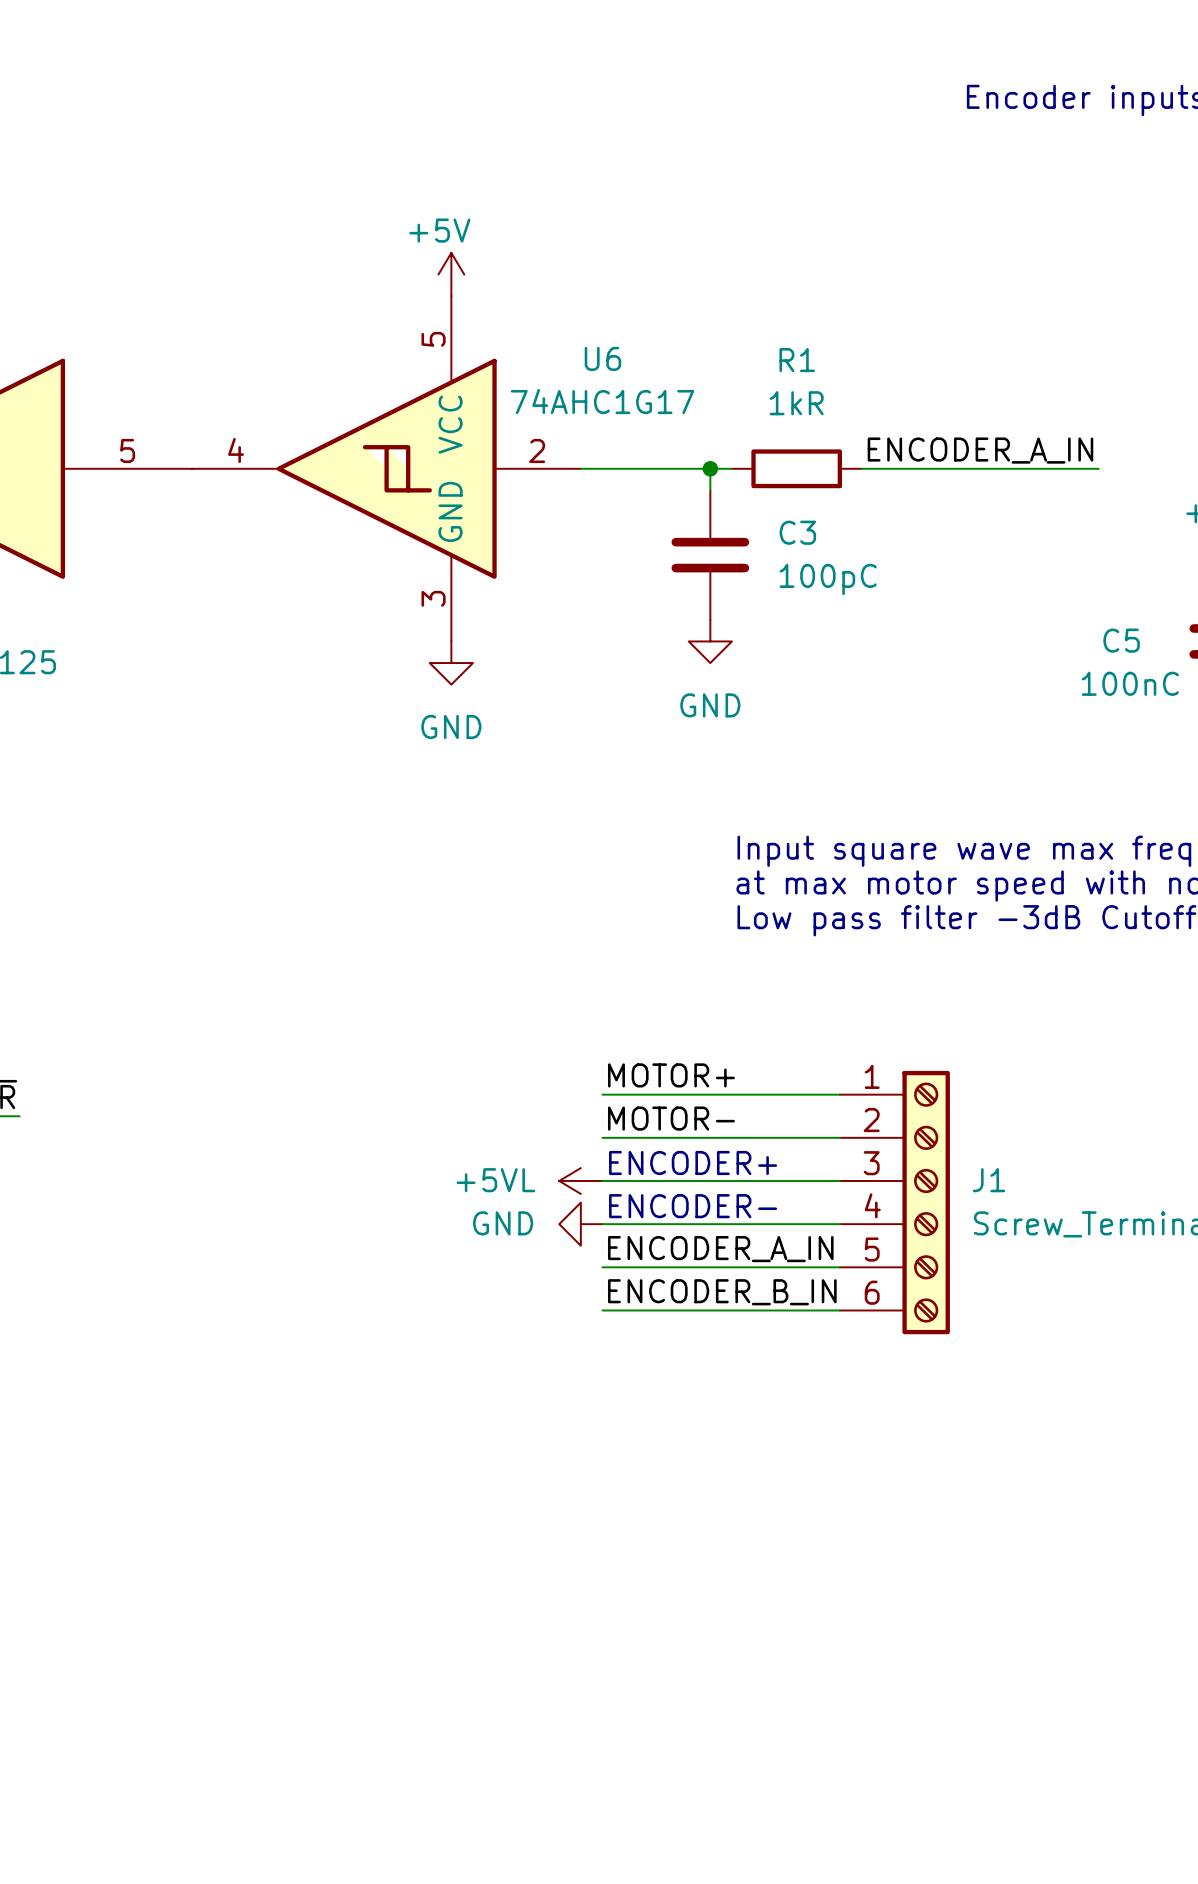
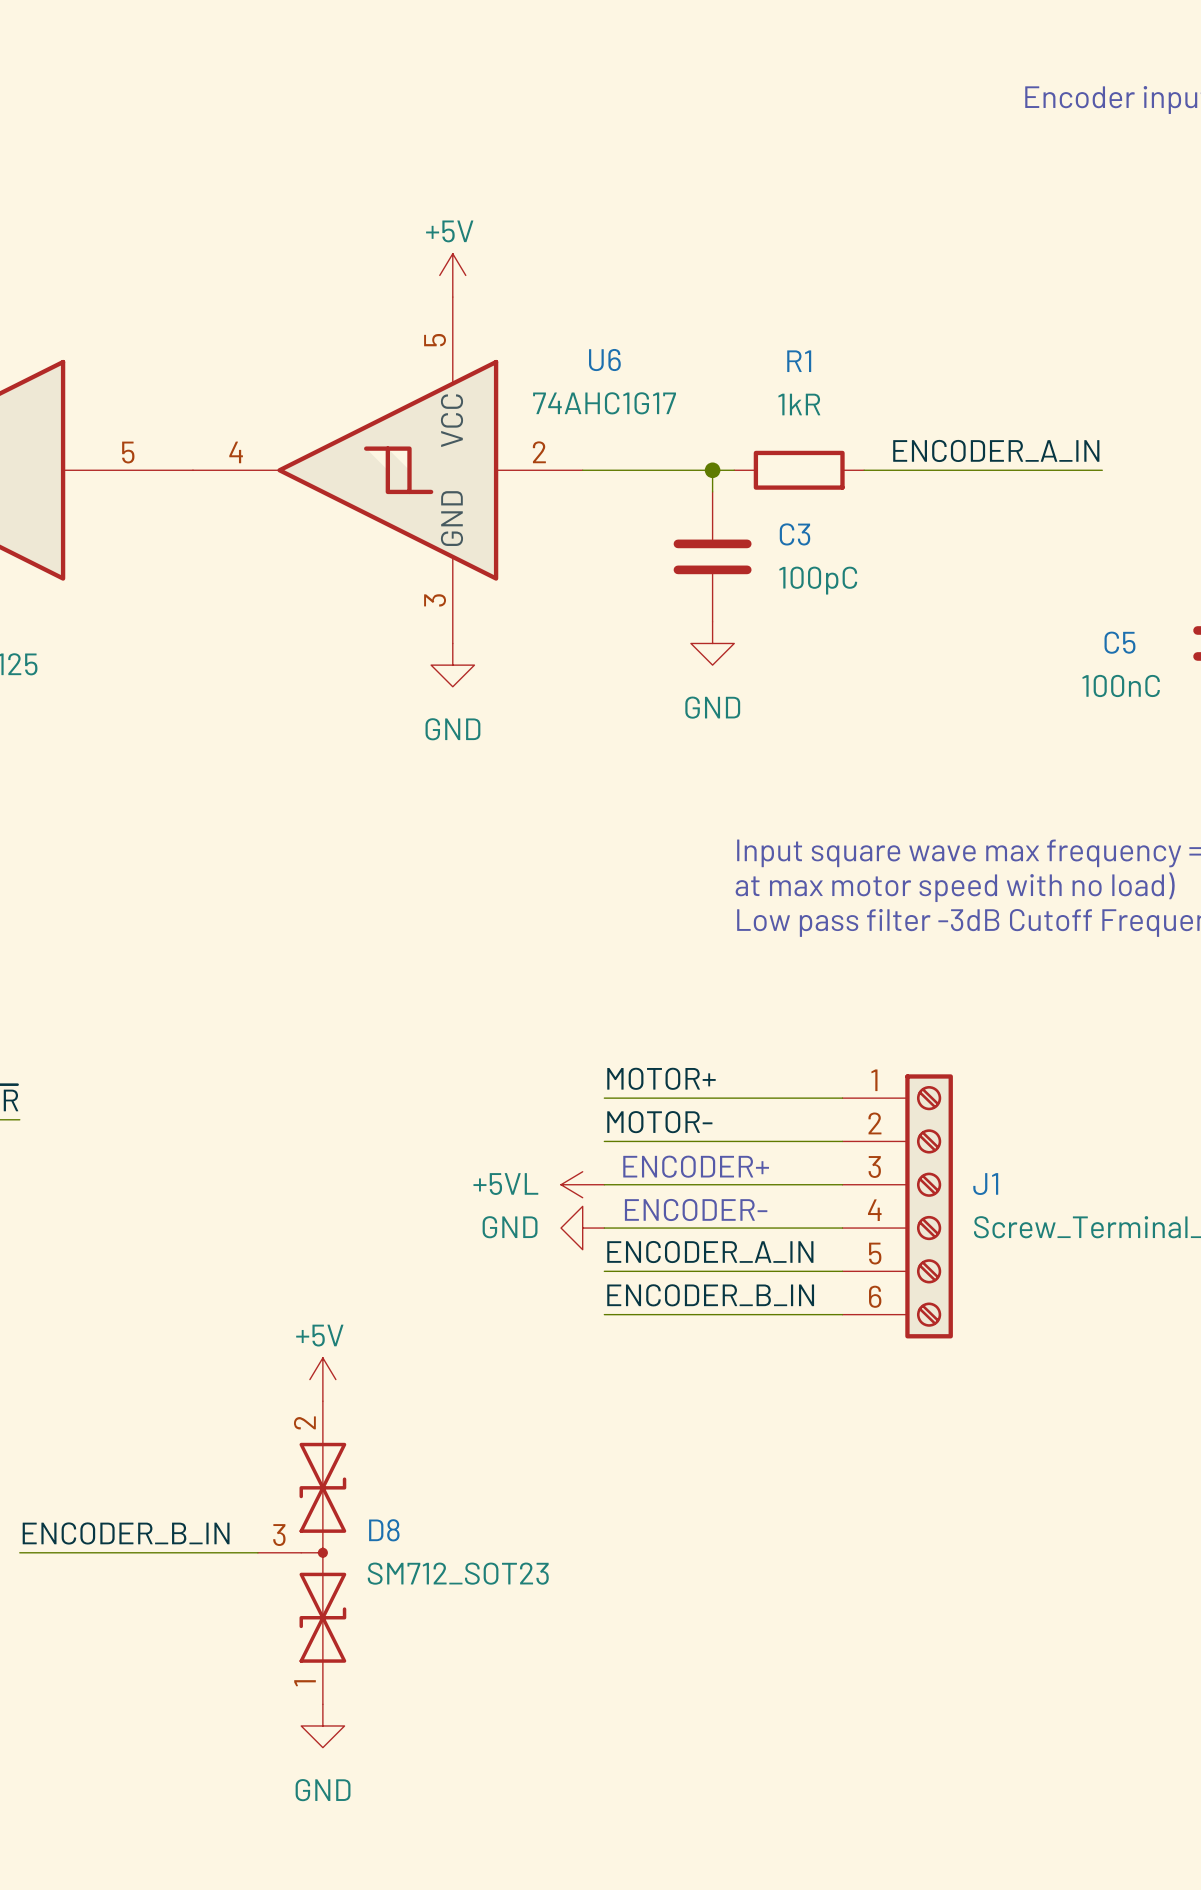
power symbol: none -> +5V (322, 1379)
label: none -> ENCODER_B_IN (126, 1533)
wire: none -> (19, 1552) (257, 1552)
D8: none -> SM712_SOT23 (302, 1552)
power symbol: none -> GND (322, 1725)

